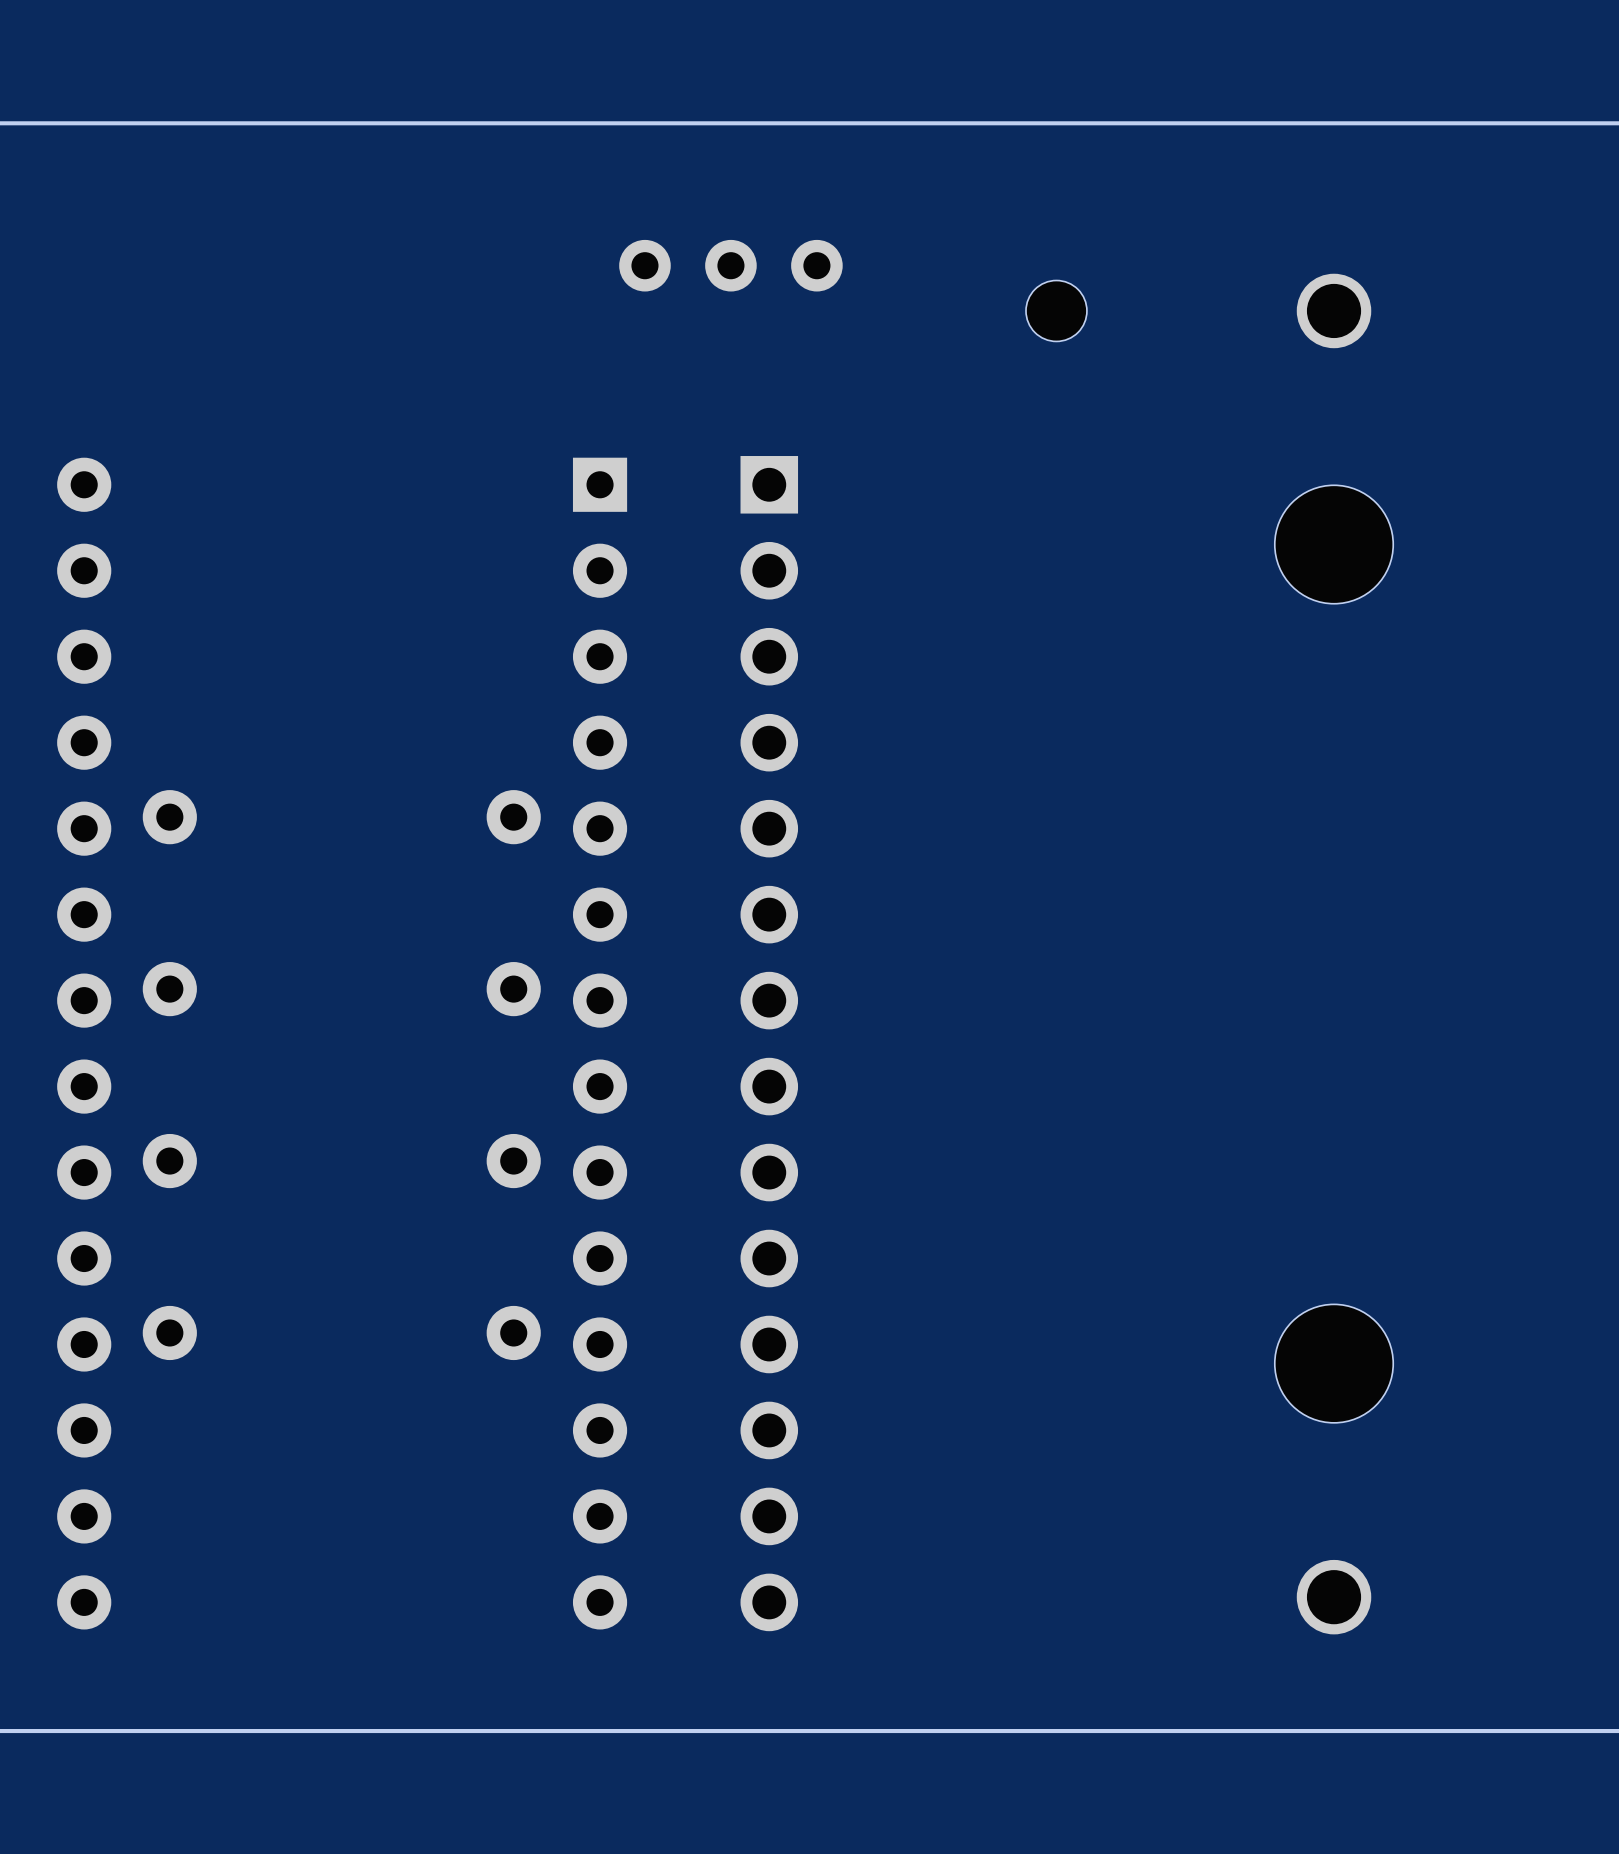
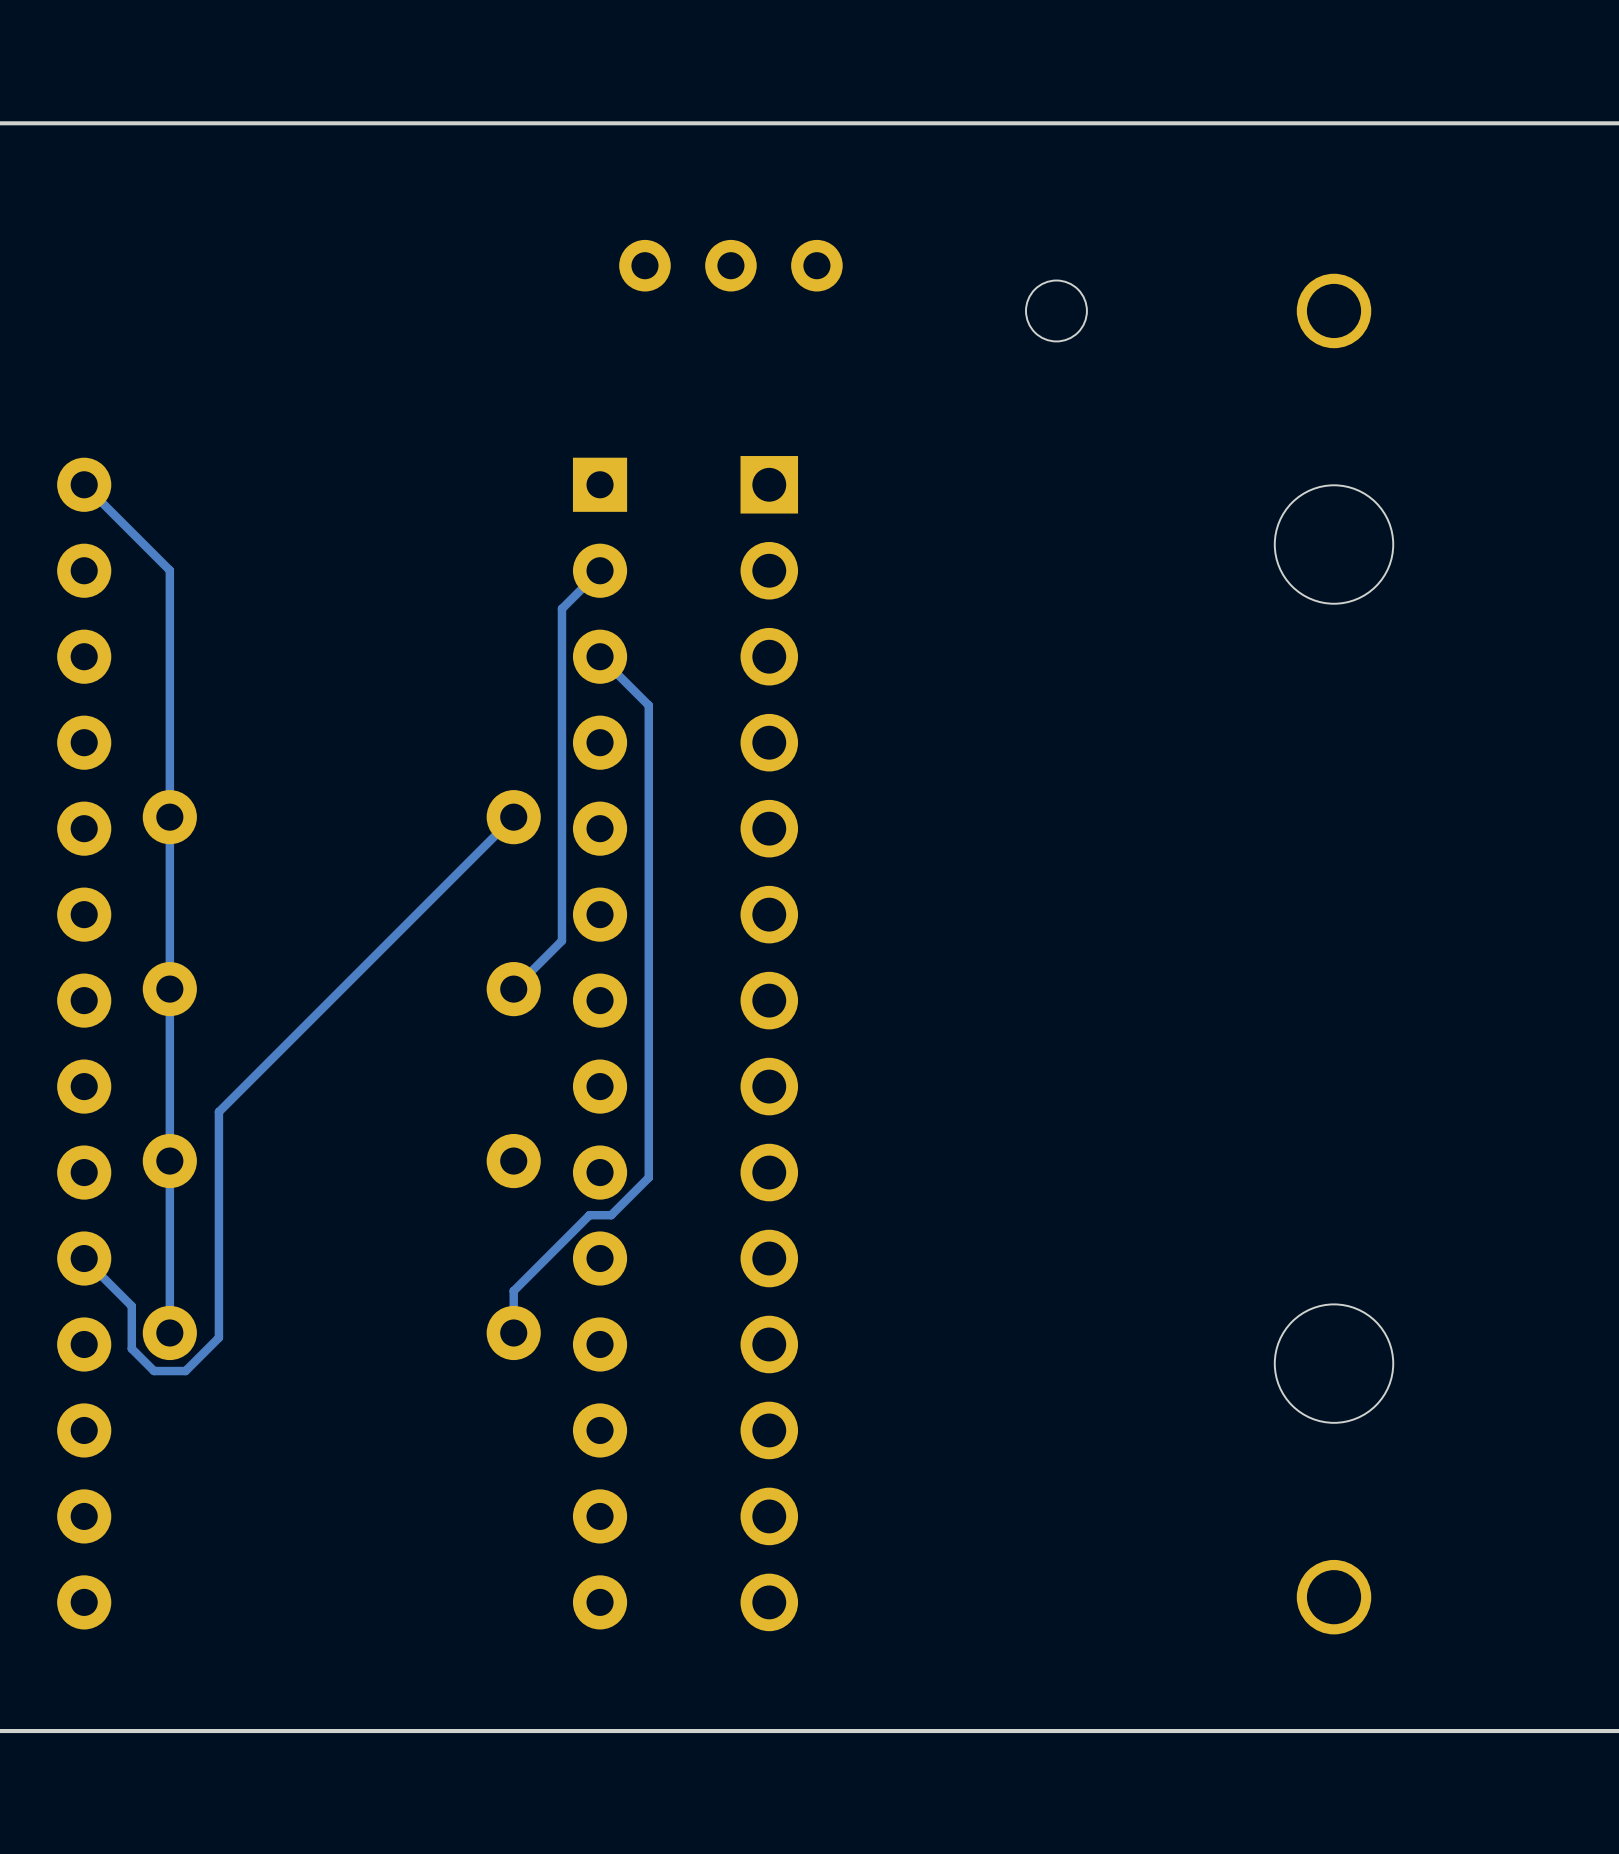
track: none -> (84, 484) (169, 570) (169, 1332)
track: none -> (600, 570) (561, 608) (561, 940) (513, 989)
track: none -> (600, 656) (648, 705) (648, 1177) (611, 1215) (589, 1215) (513, 1291) (513, 1332)
track: none -> (513, 817) (218, 1111) (218, 1337) (185, 1371) (154, 1371) (131, 1348) (131, 1306) (84, 1258)

